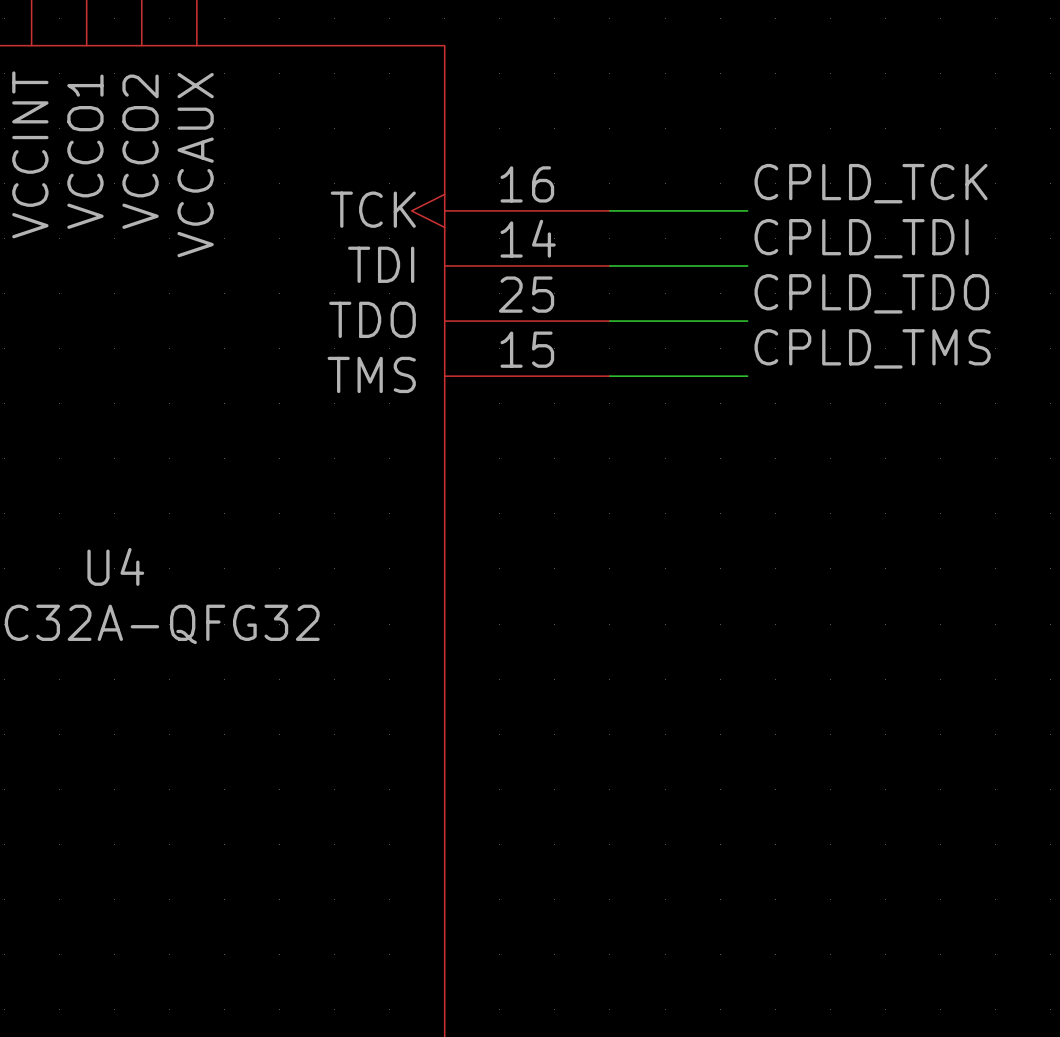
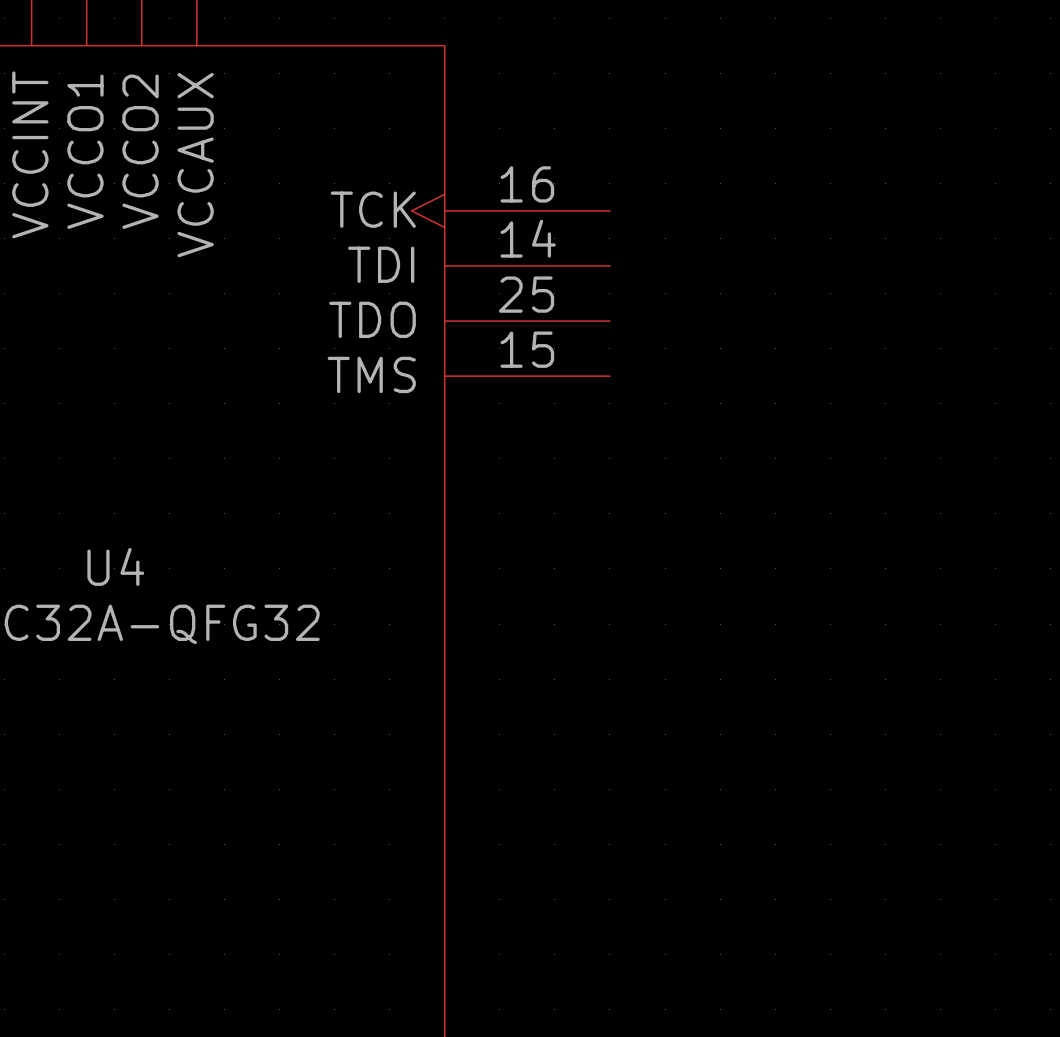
label: CPLD_TCK (871, 183) -> none
wire: (609, 210) (747, 210) -> none
label: CPLD_TDI (861, 238) -> none
wire: (609, 265) (747, 265) -> none
label: CPLD_TDO (871, 293) -> none
wire: (609, 321) (747, 321) -> none
label: CPLD_TMS (872, 348) -> none
wire: (609, 376) (747, 376) -> none

